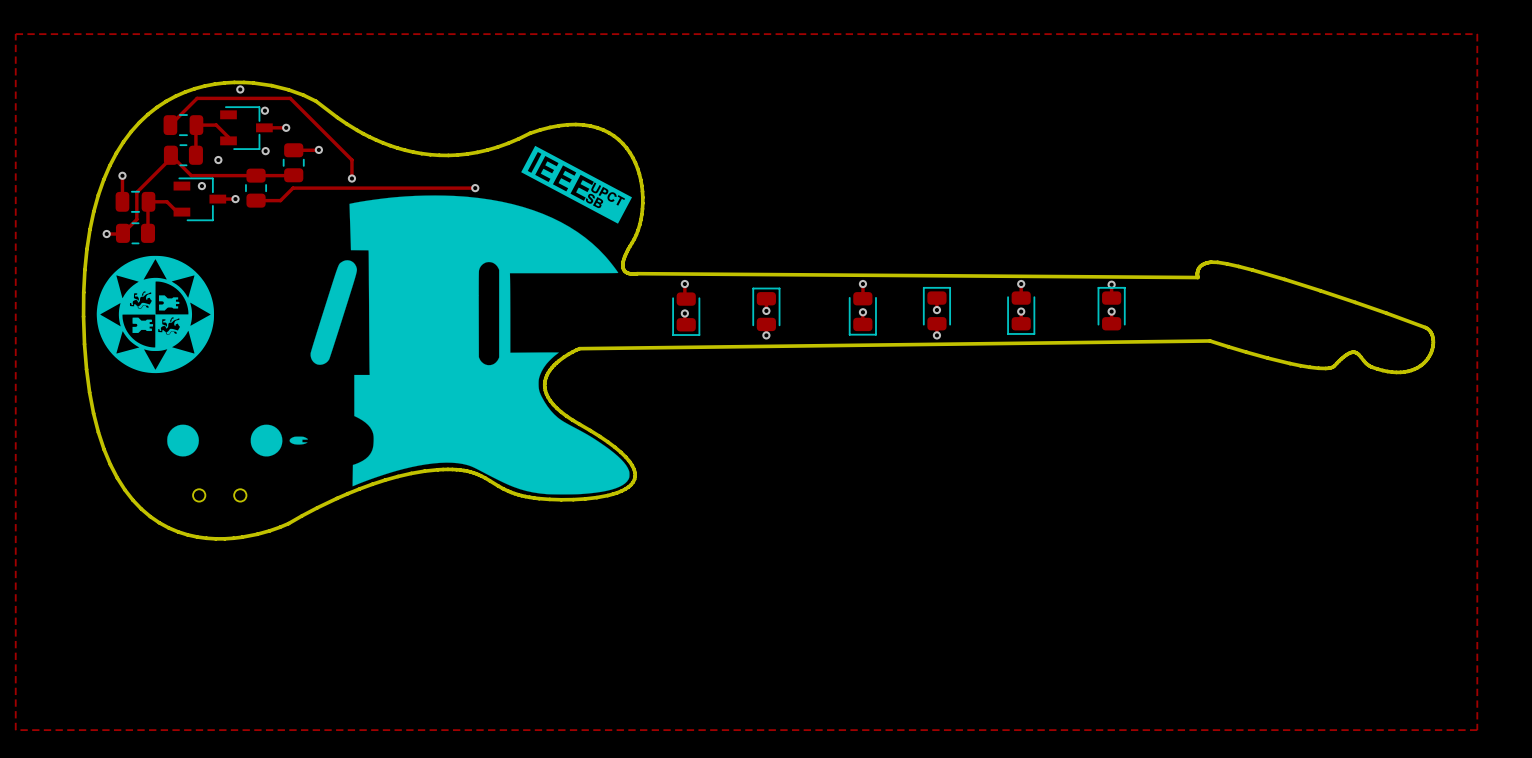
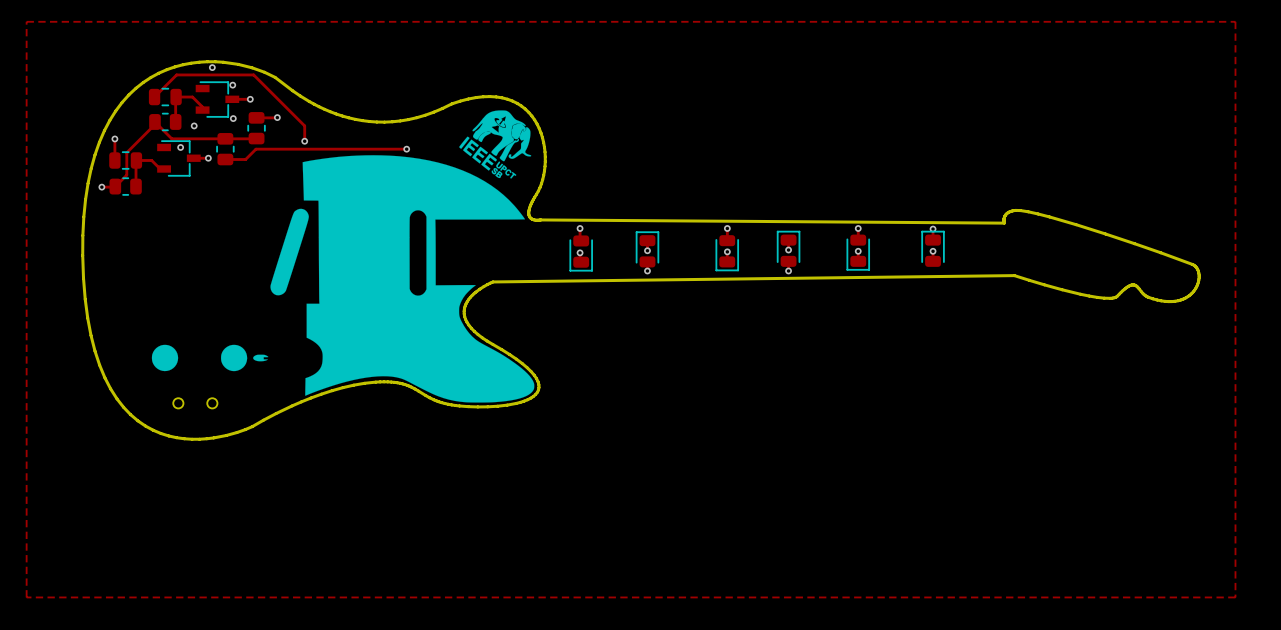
drawing: none -> [151, 110, 535, 403]
drawing: [96, 145, 633, 495] -> none

